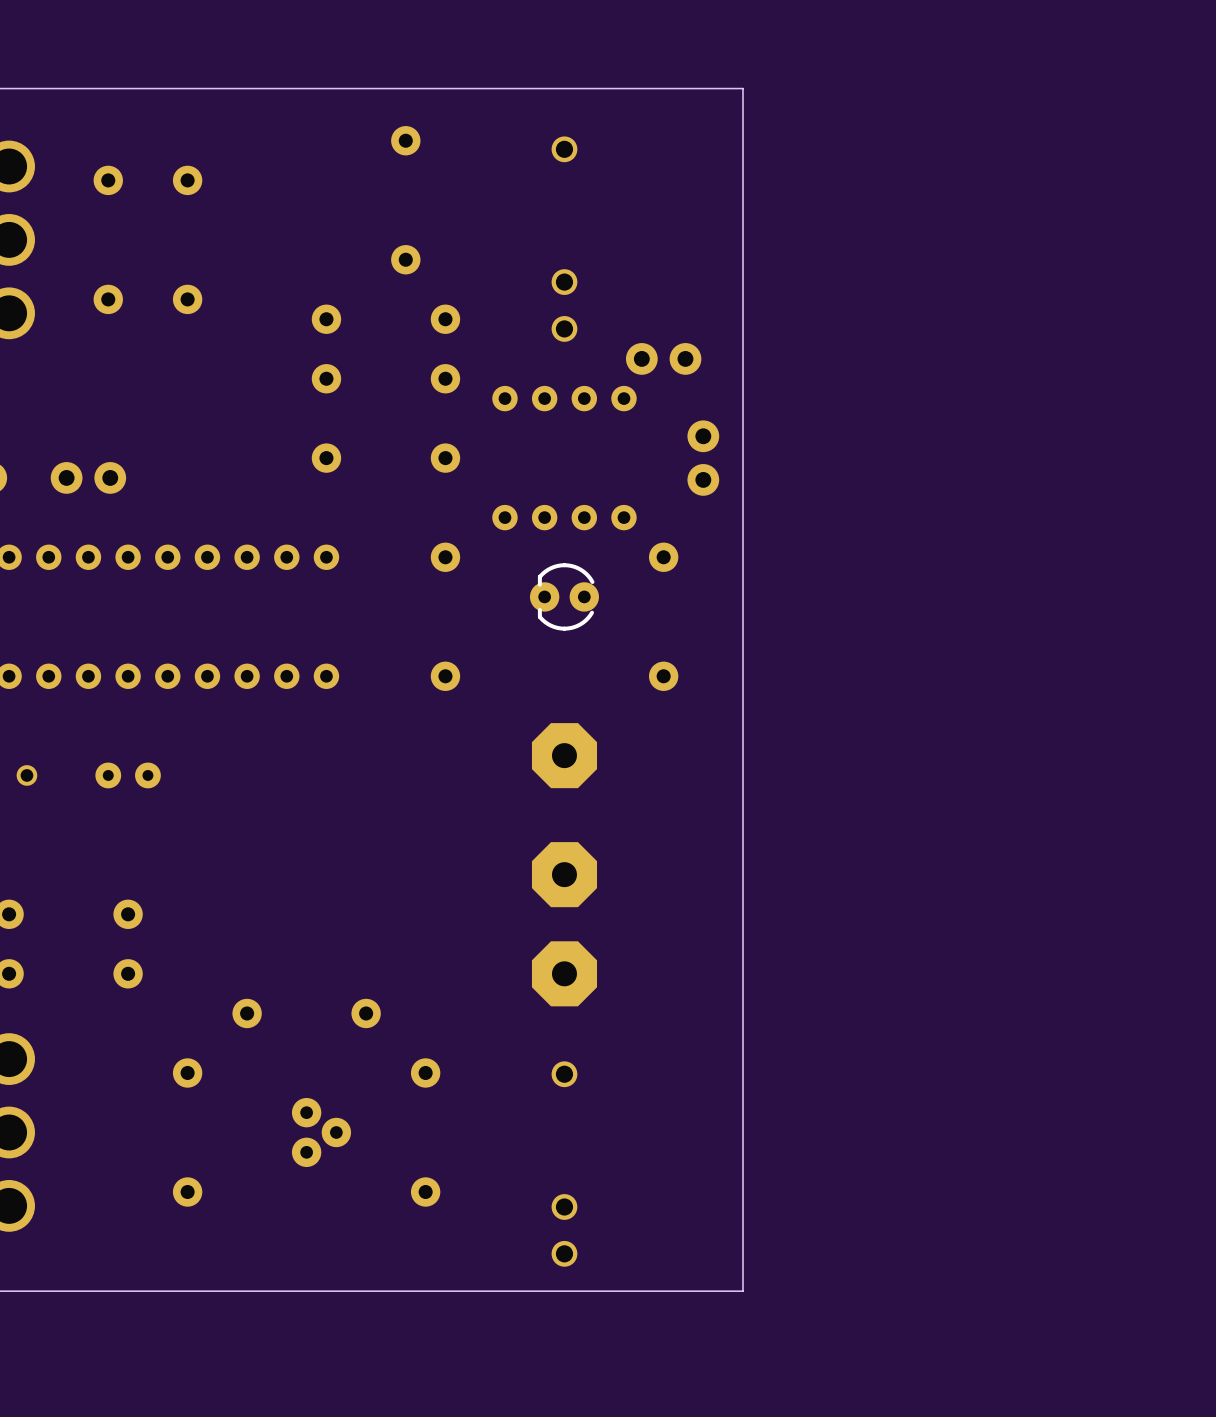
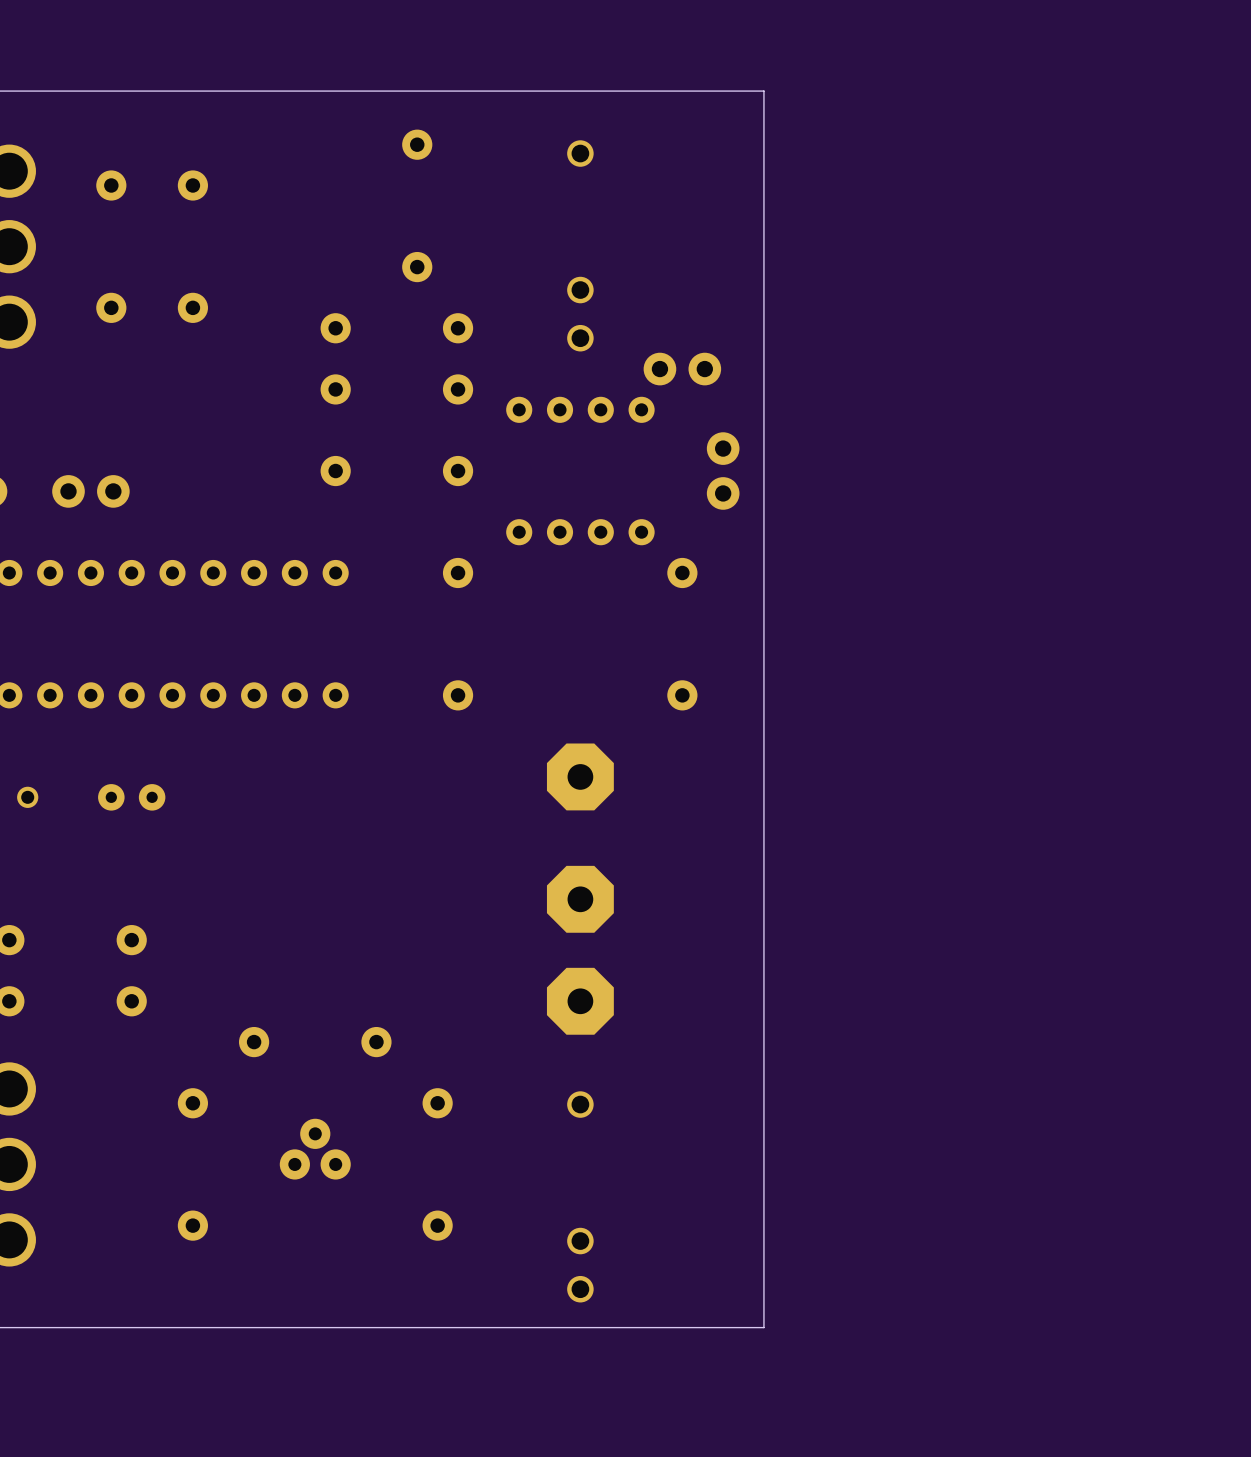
part: (564, 596) -> none
part rotation: 0° (321, 1132) -> 90° counterclockwise (315, 1149)

